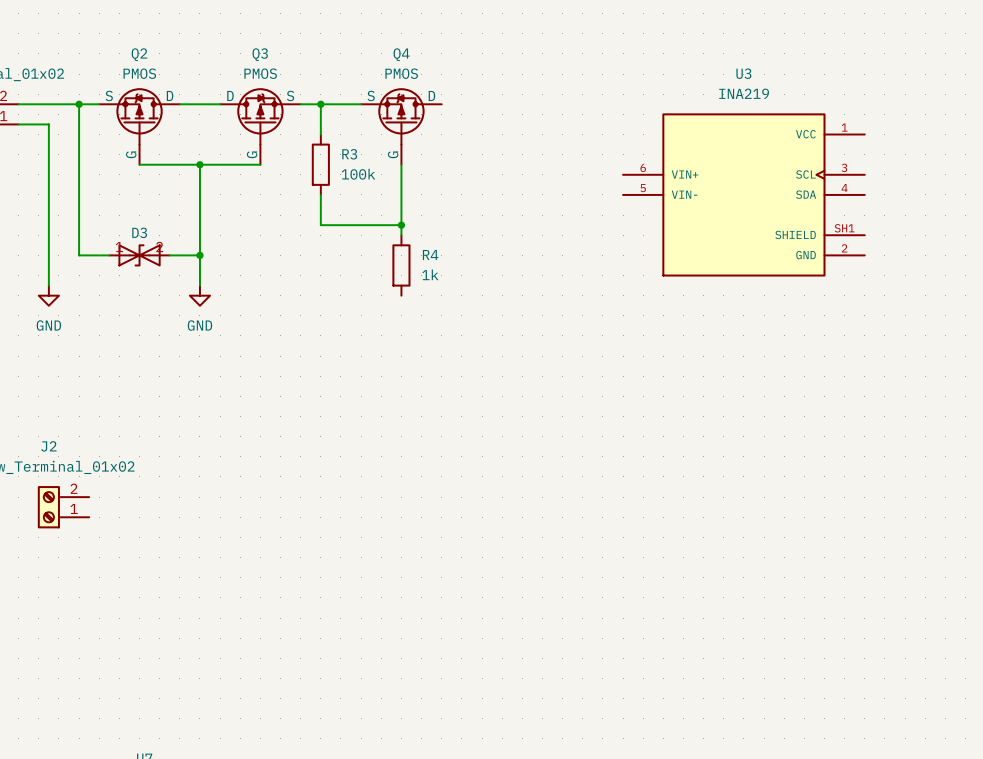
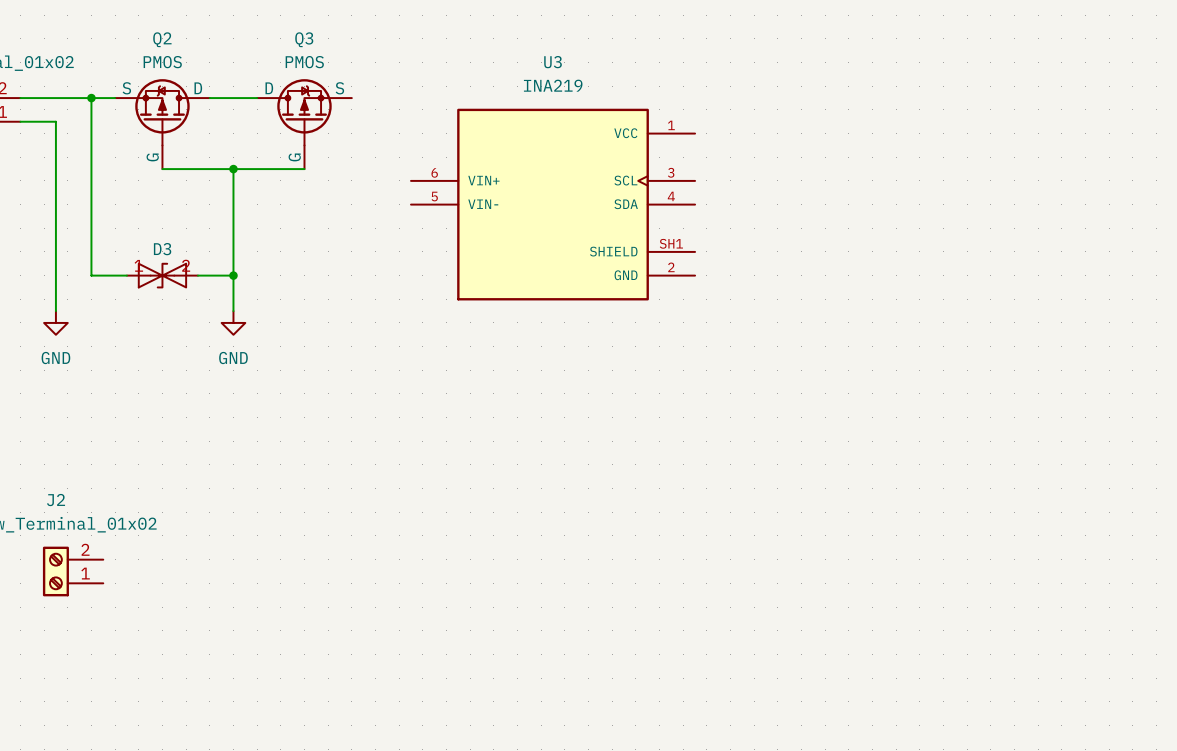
wire: (300, 104) (361, 104) -> none
wire: (320, 104) (320, 134) -> none
junction: (320, 104) -> none
Q4: PMOS (401, 126) -> none
R3: 100k (320, 164) -> none
wire: (320, 194) (320, 225) (401, 225) -> none
U3 position: (743, 194) -> (553, 204)
junction: (401, 225) -> none
R4: 1k (401, 265) -> none

